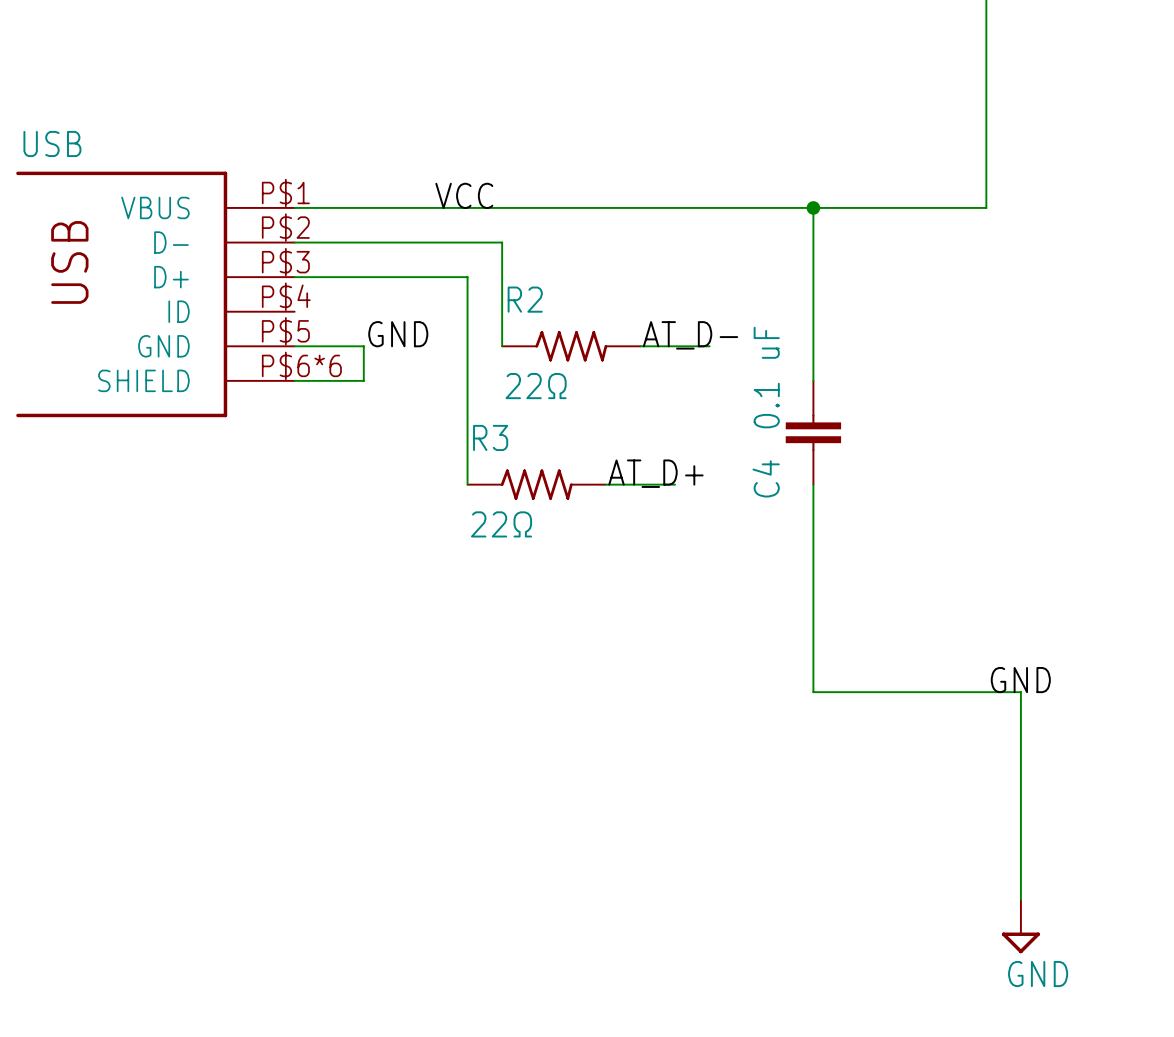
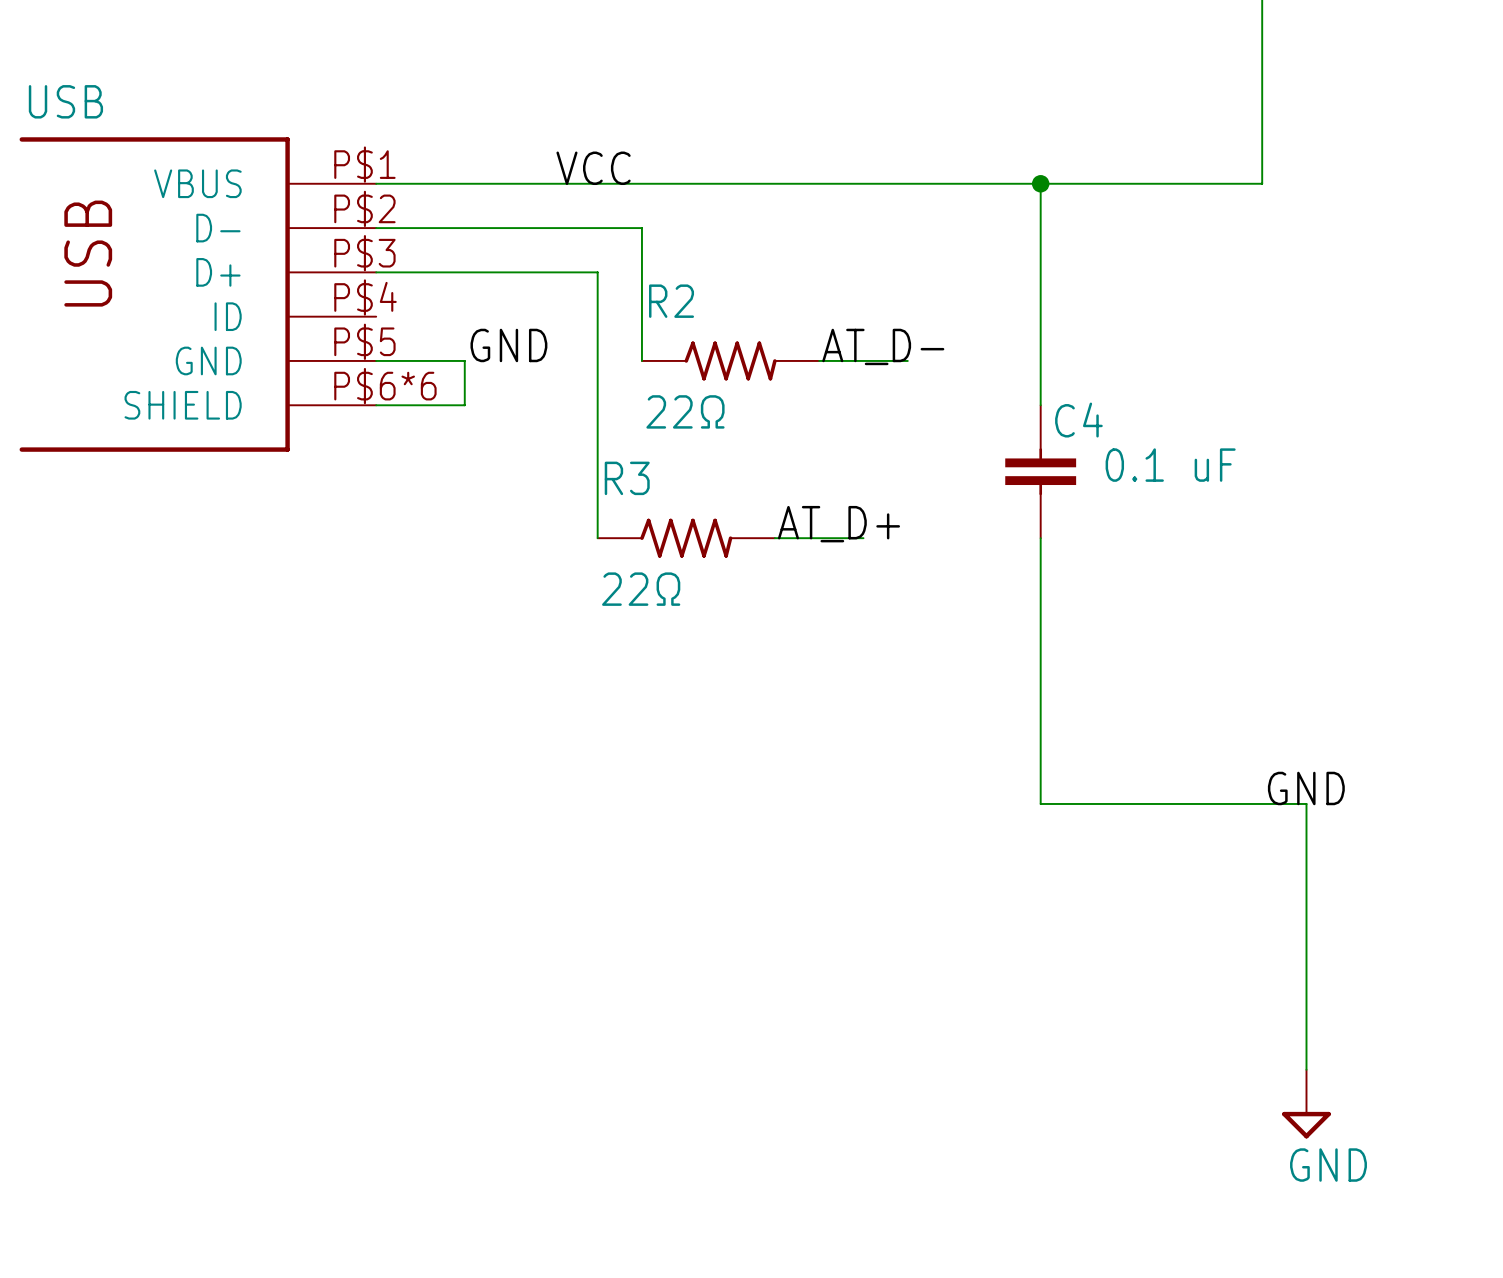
C4 value rotation: 0° (766, 377) -> 90° clockwise (1170, 465)
C4 value position: 0.1 uF (766, 377) -> 0.1 uF (1170, 465)
C4 name rotation: 0° (766, 478) -> 90° clockwise (1078, 420)
C4 name position: C4 (766, 478) -> C4 (1078, 420)

